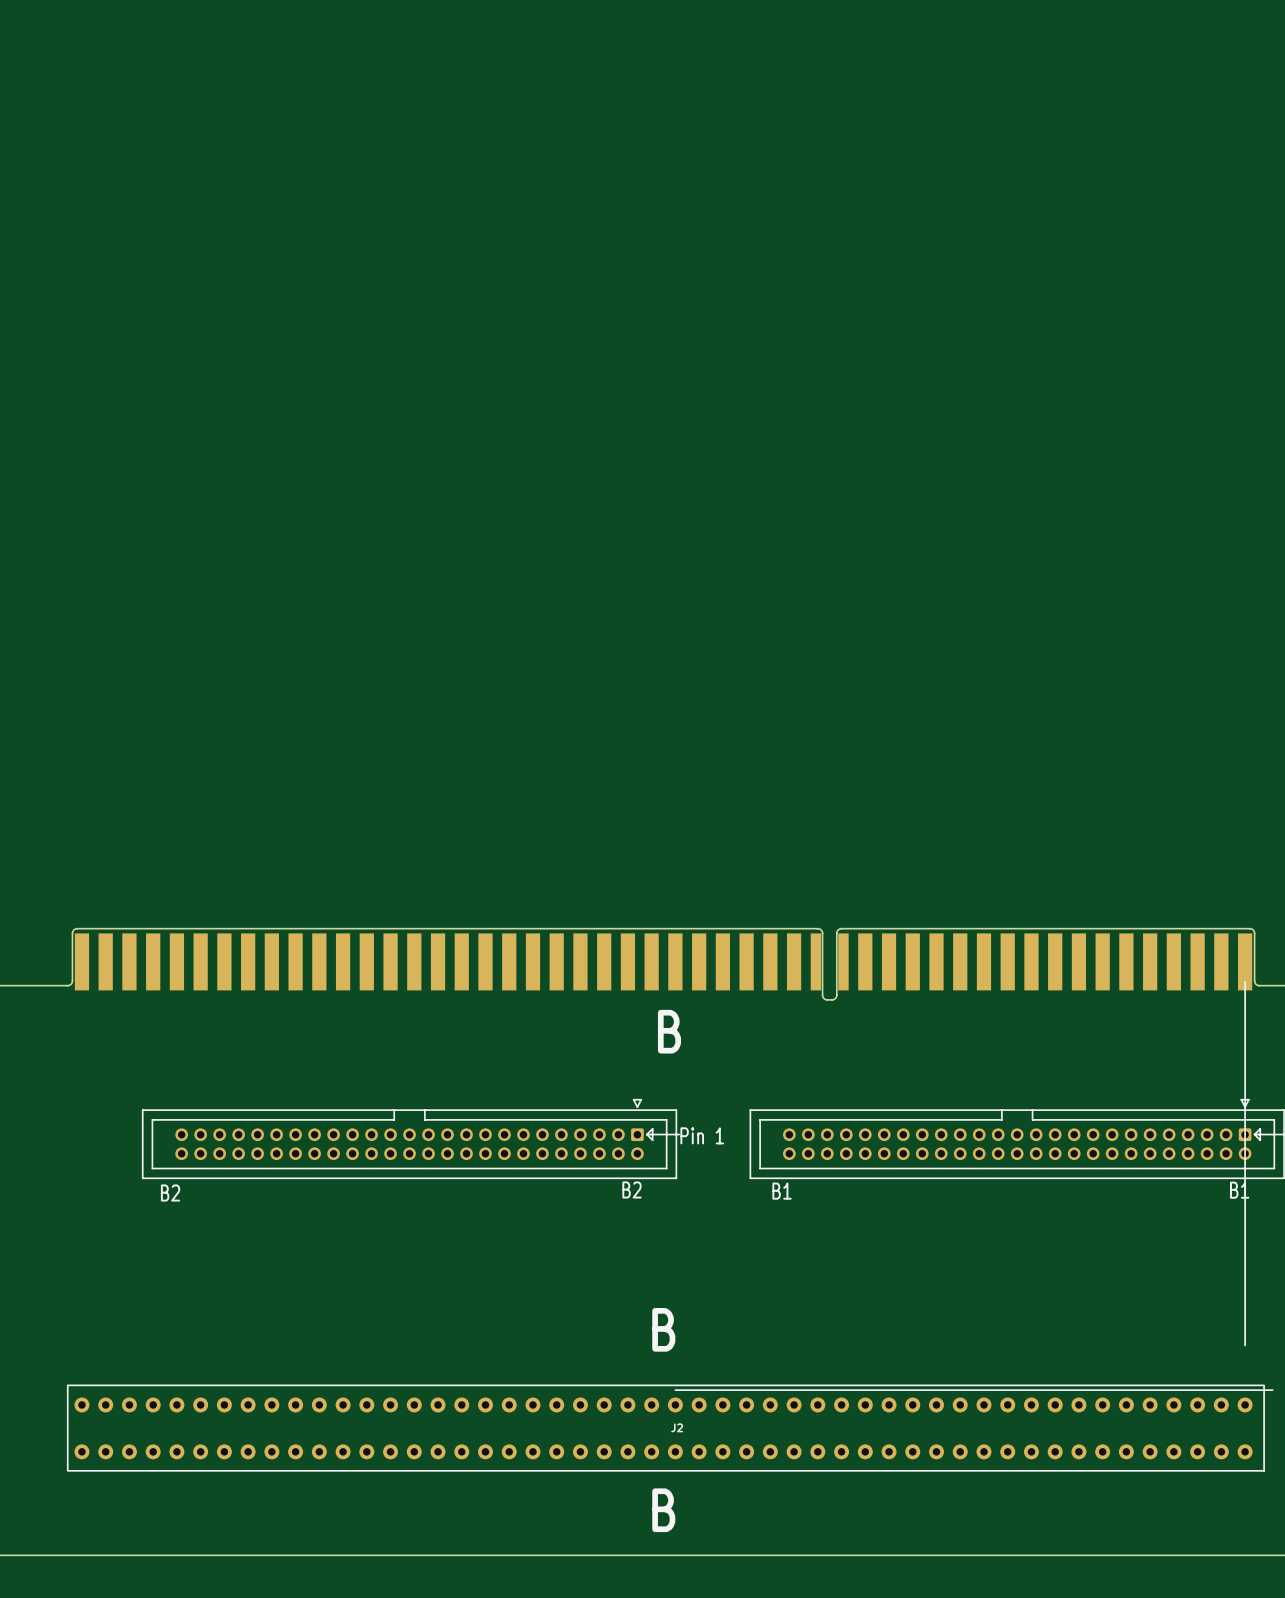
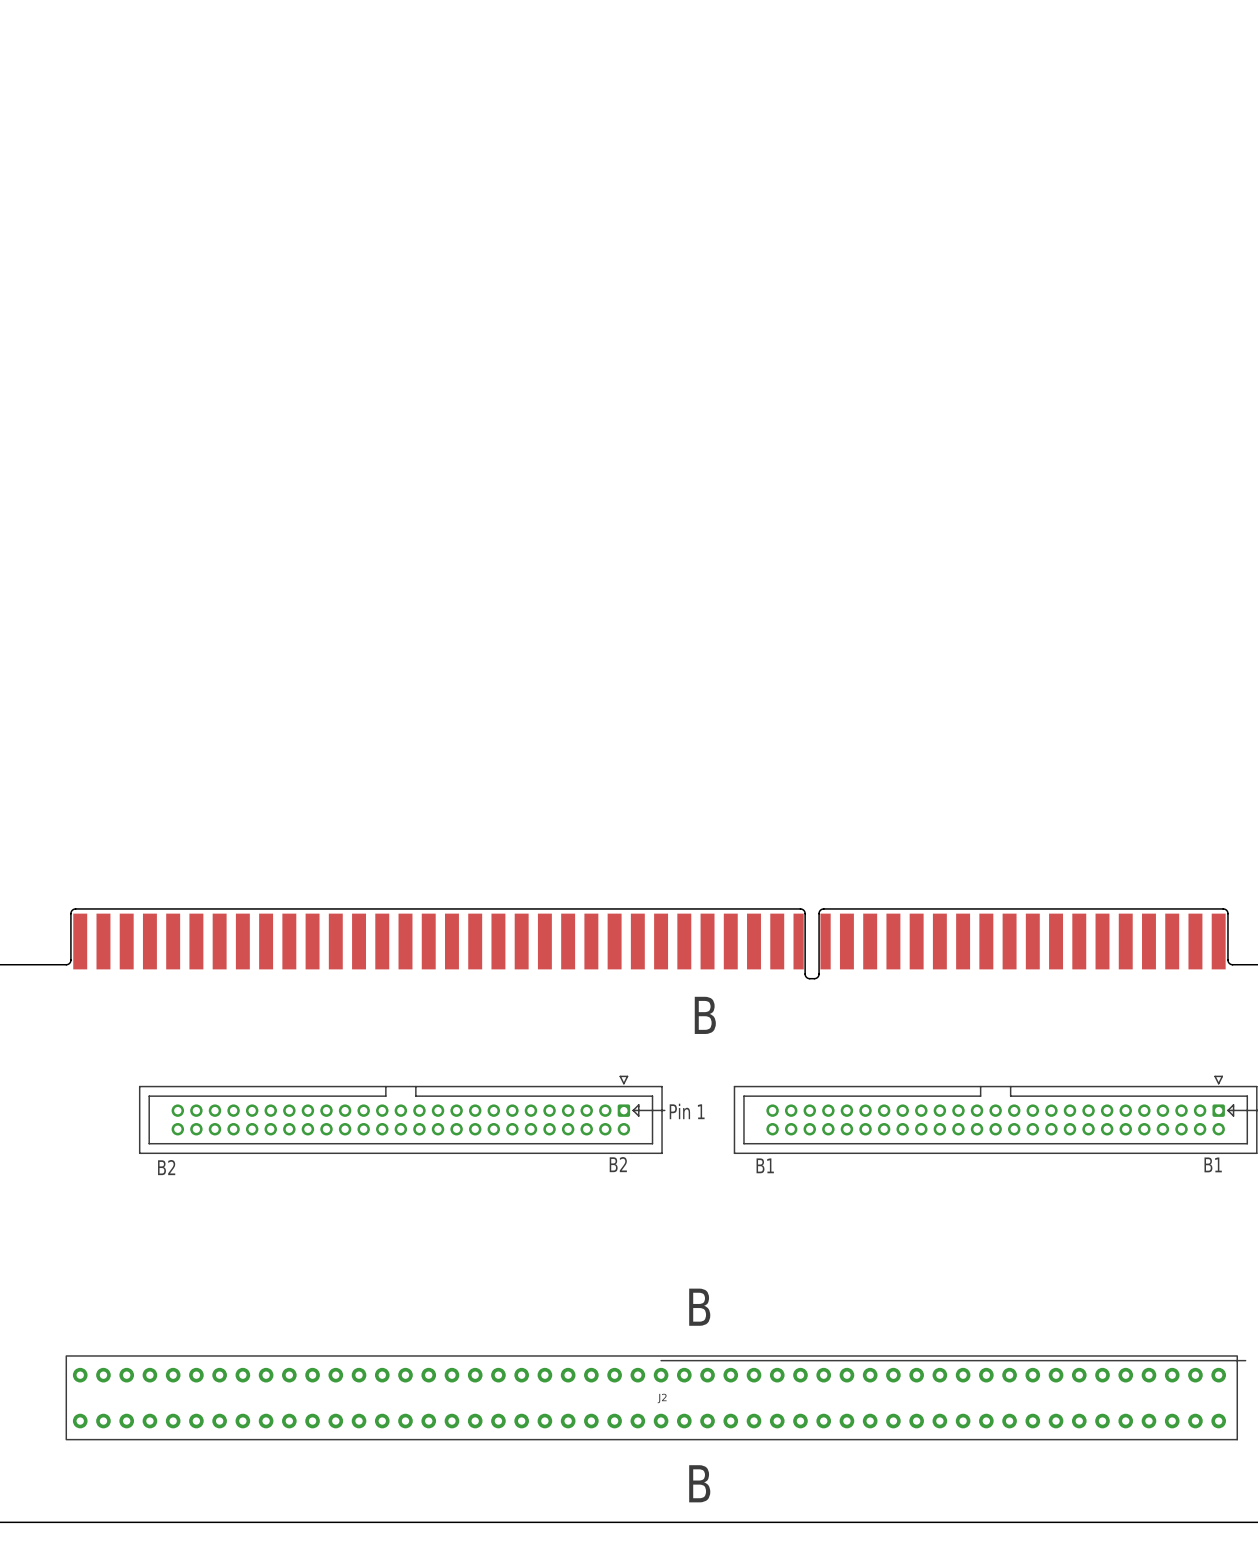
line: (1245, 981) (1245, 1345) -> none
text position: B (669, 1031) -> B (705, 1015)
text position: B (663, 1329) -> B (699, 1307)
text position: B (663, 1510) -> B (699, 1483)

